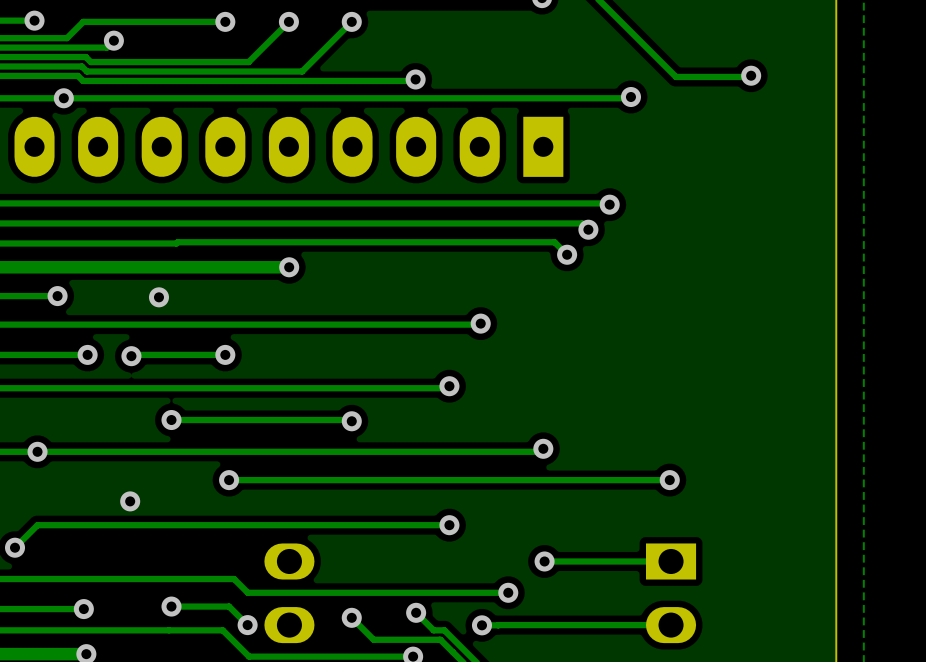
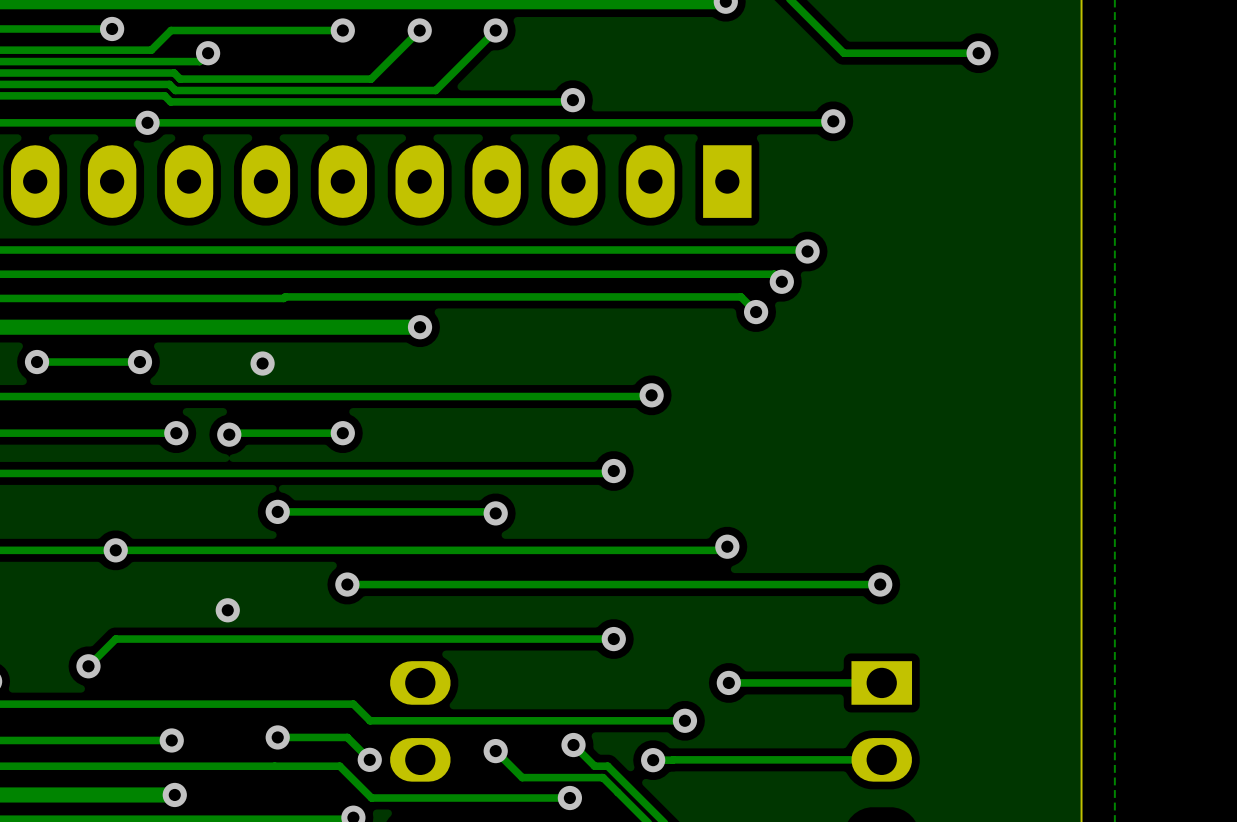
track: (639, 40) (676, 76) (751, 75) -> (843, 53) (978, 53)
via position: (751, 75) -> (978, 53)

